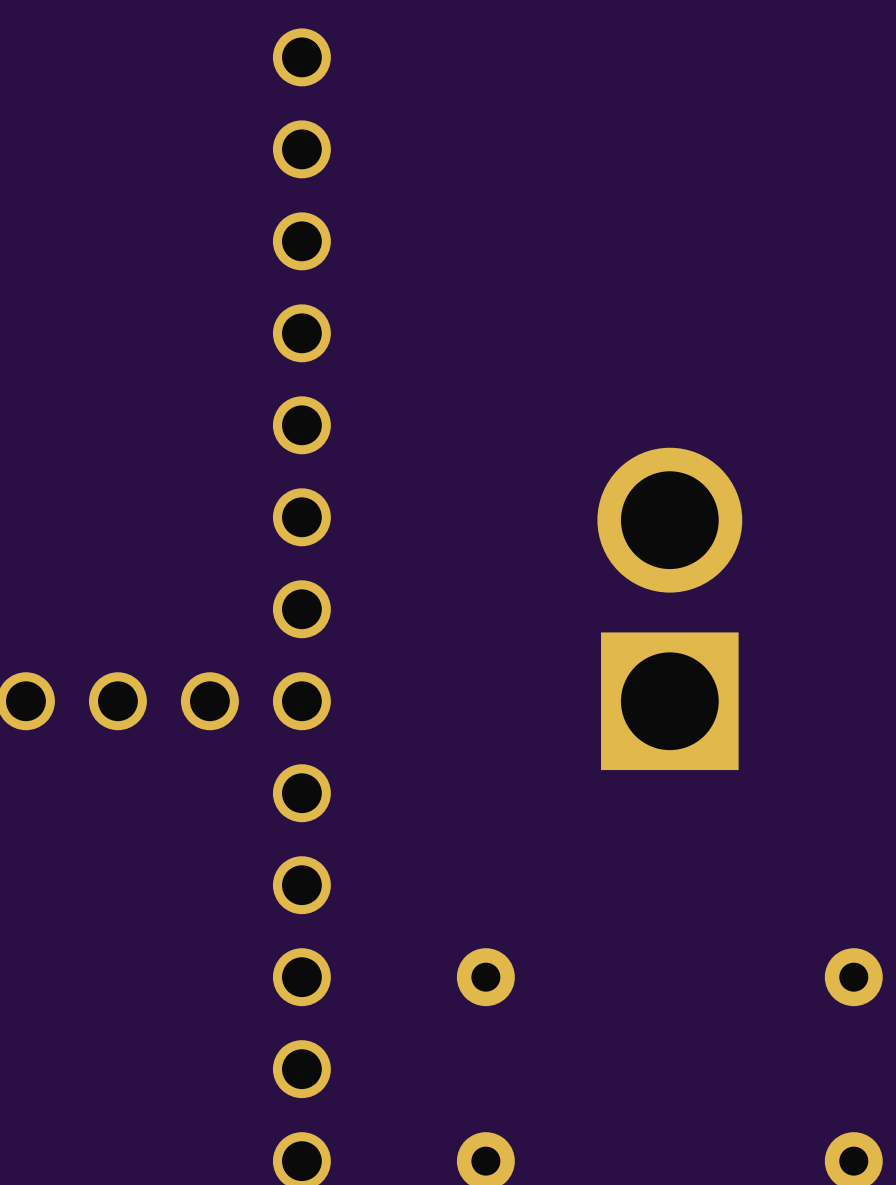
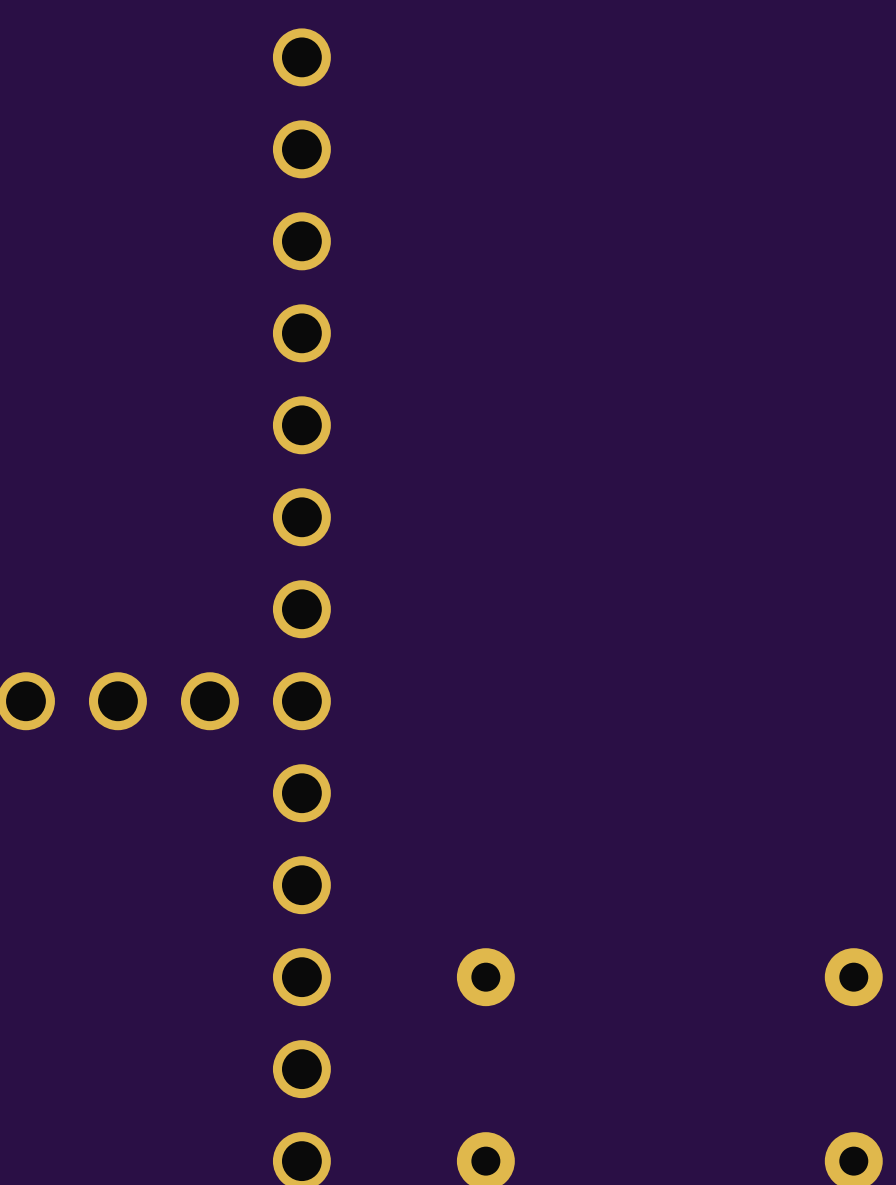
part: (669, 608) -> none

